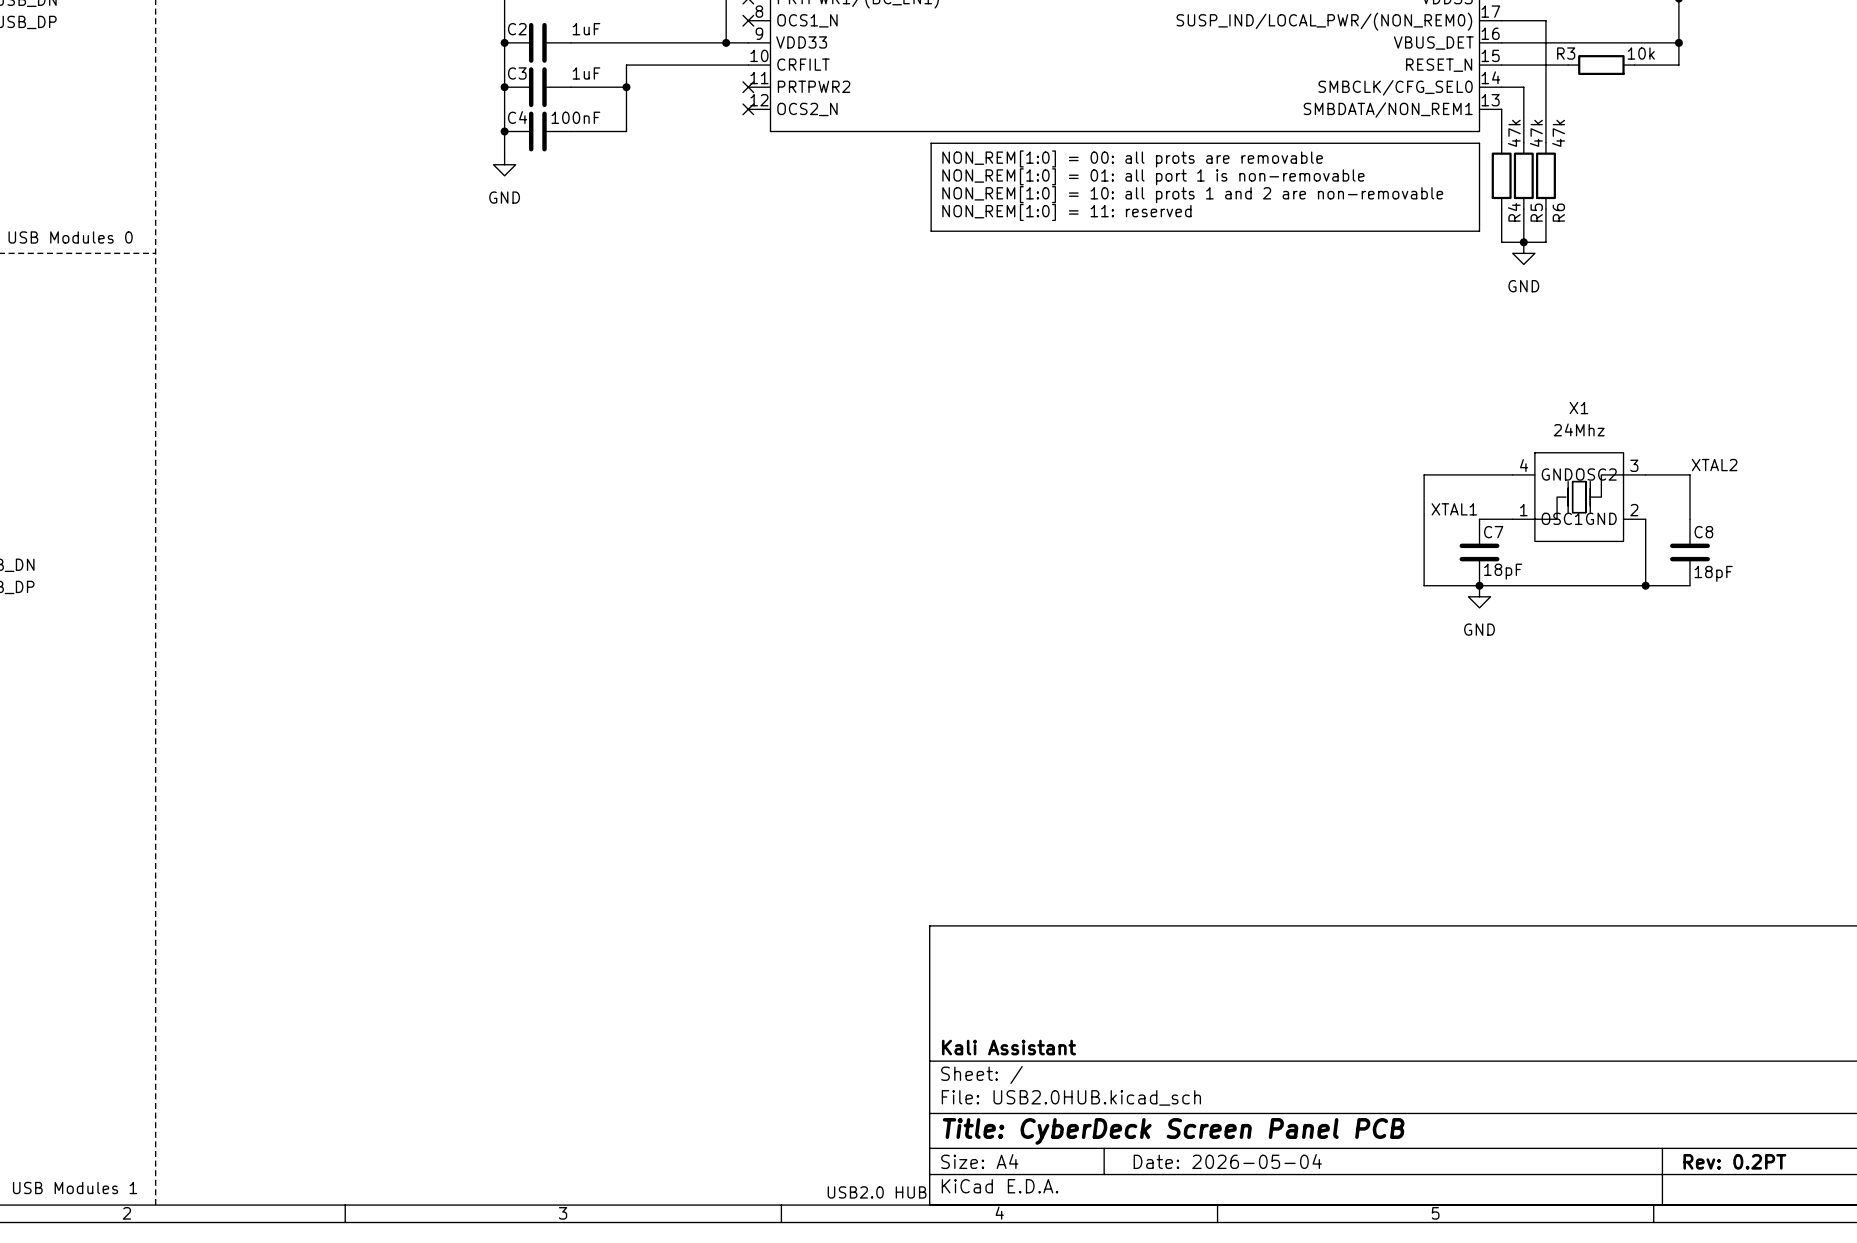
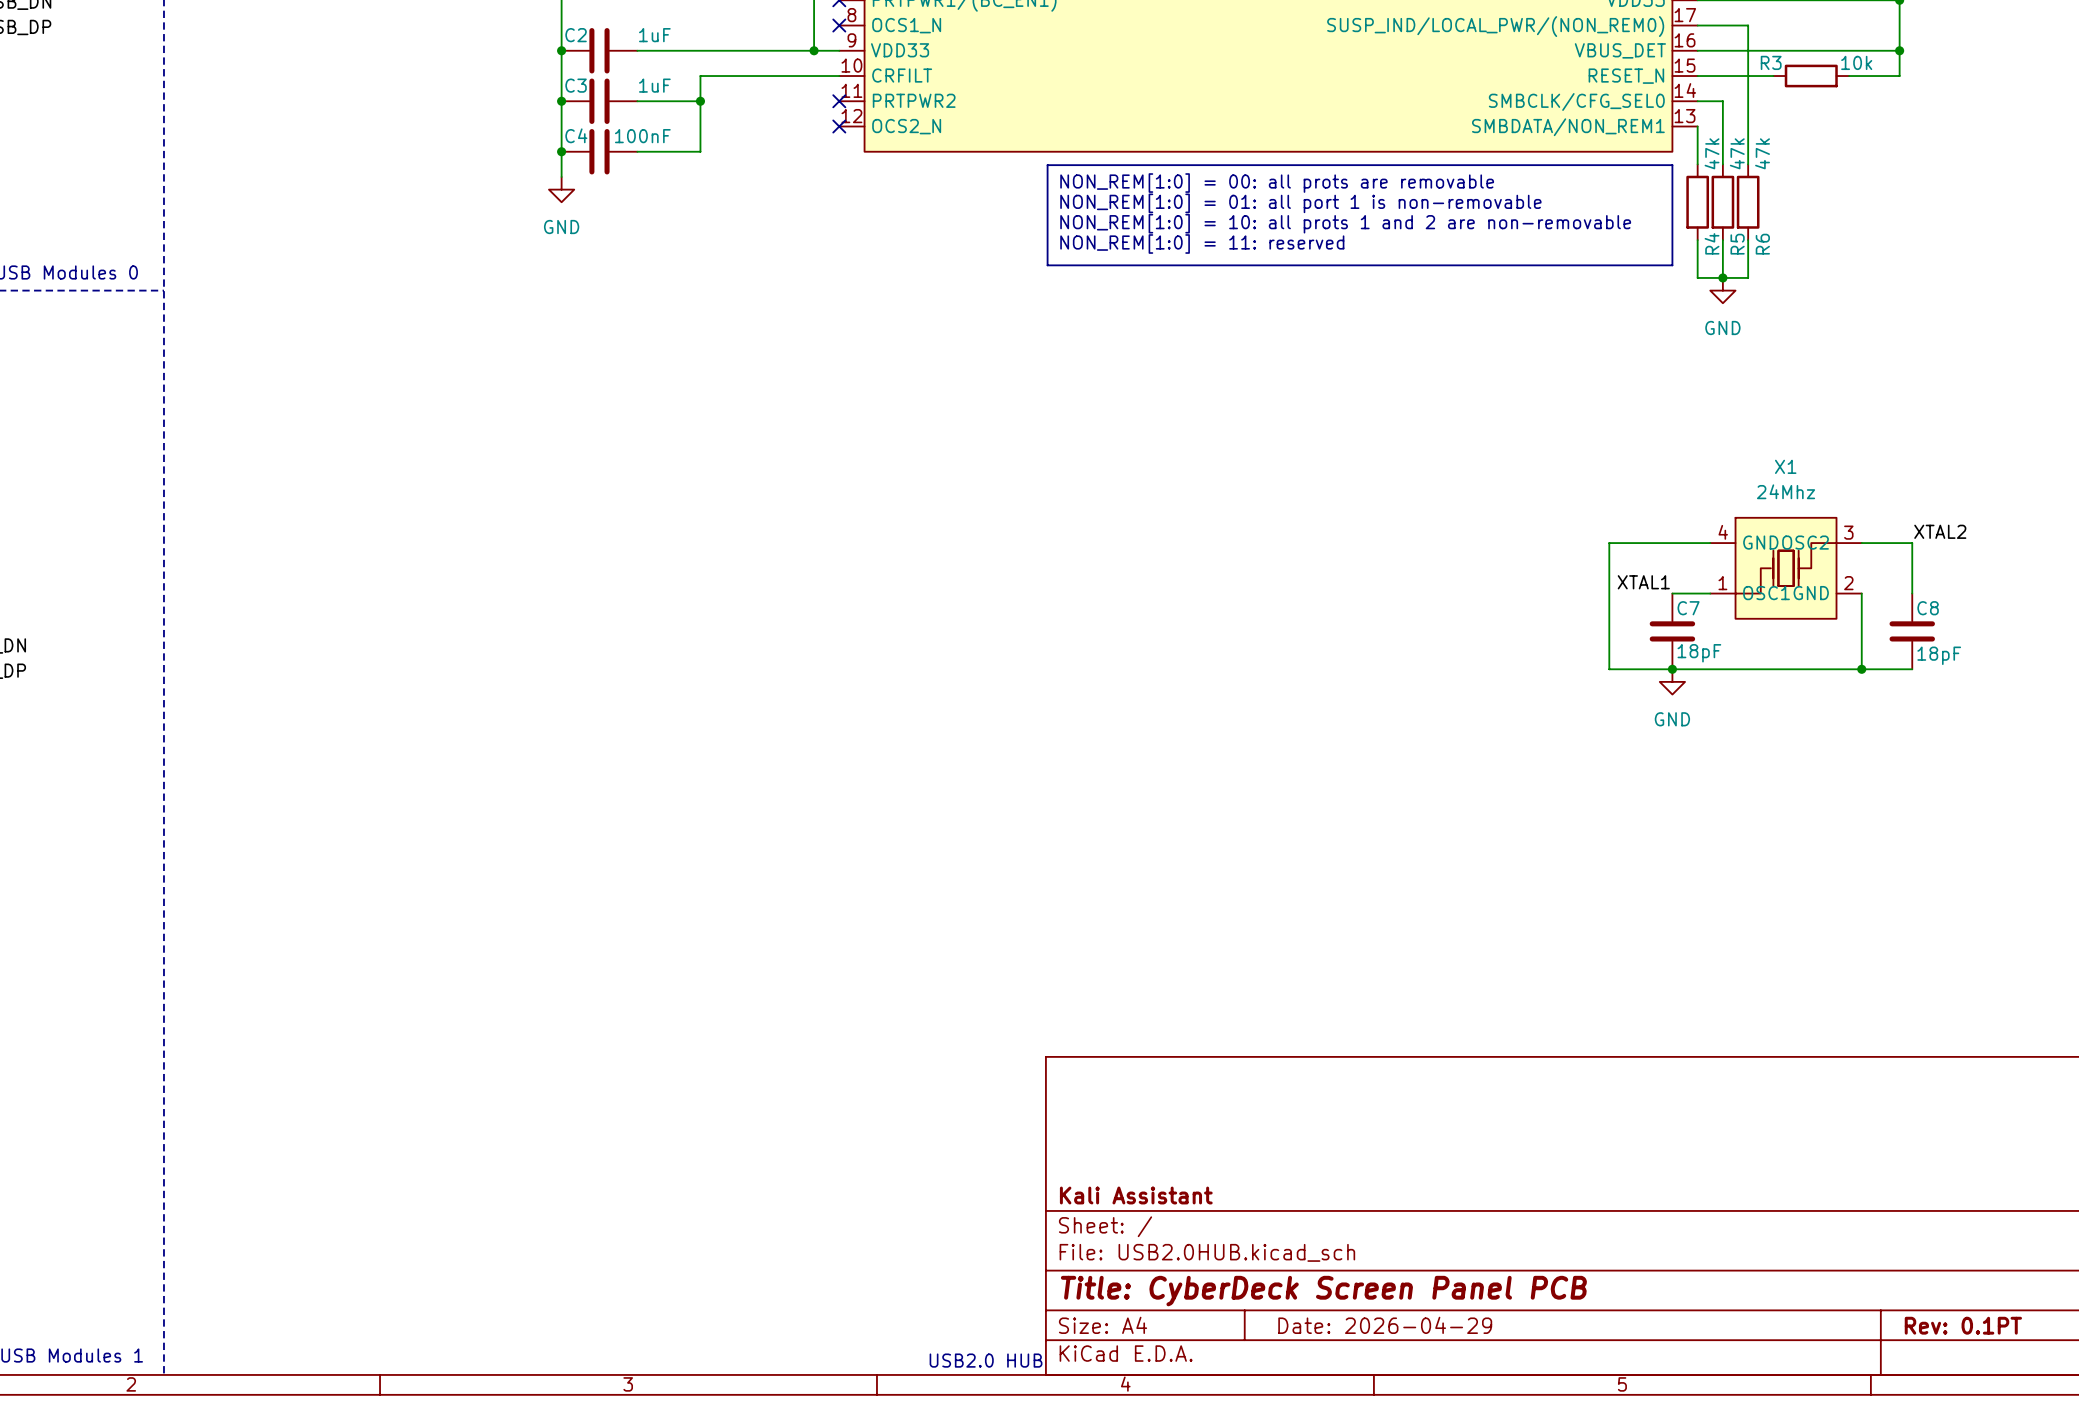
title block: Date: 2026-05-04 (1227, 1161) -> Date: 2026-04-29 (1385, 1325)
title block: Rev: 0.2PT (1734, 1161) -> Rev: 0.1PT (1963, 1325)

